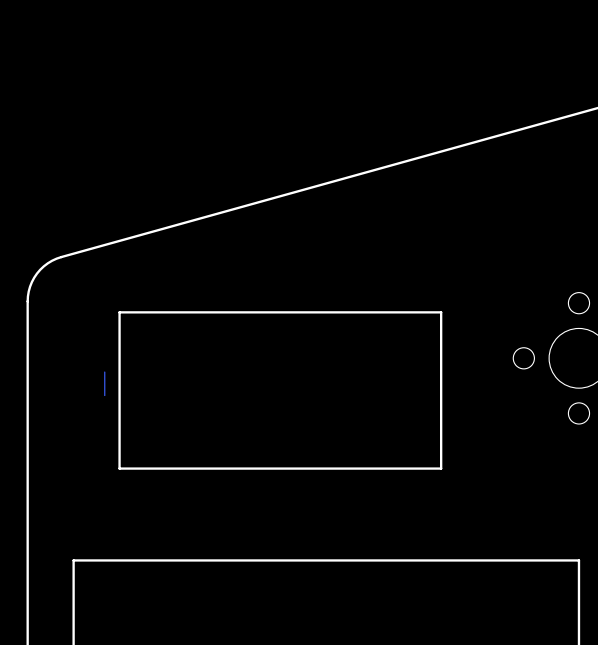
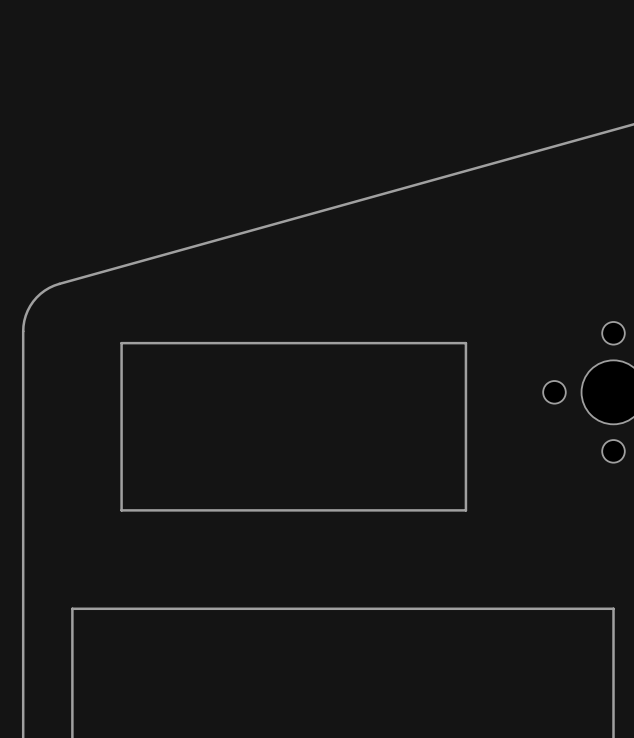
track: (104, 372) (104, 395) -> none

